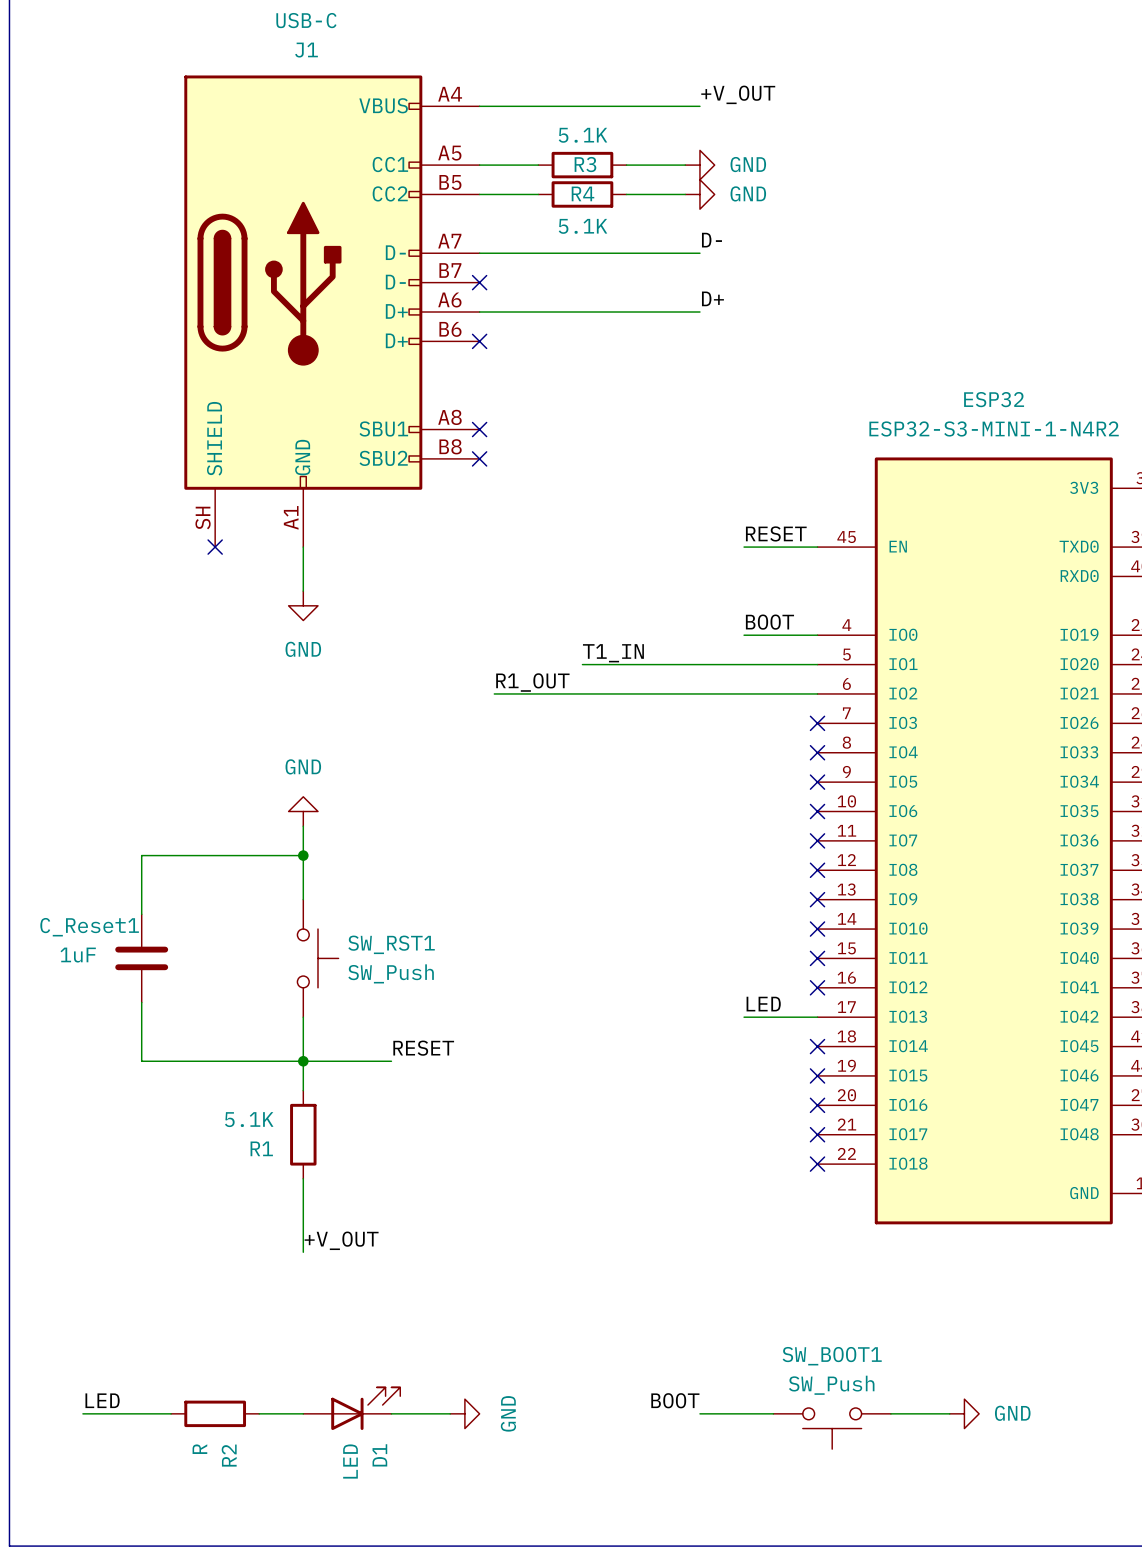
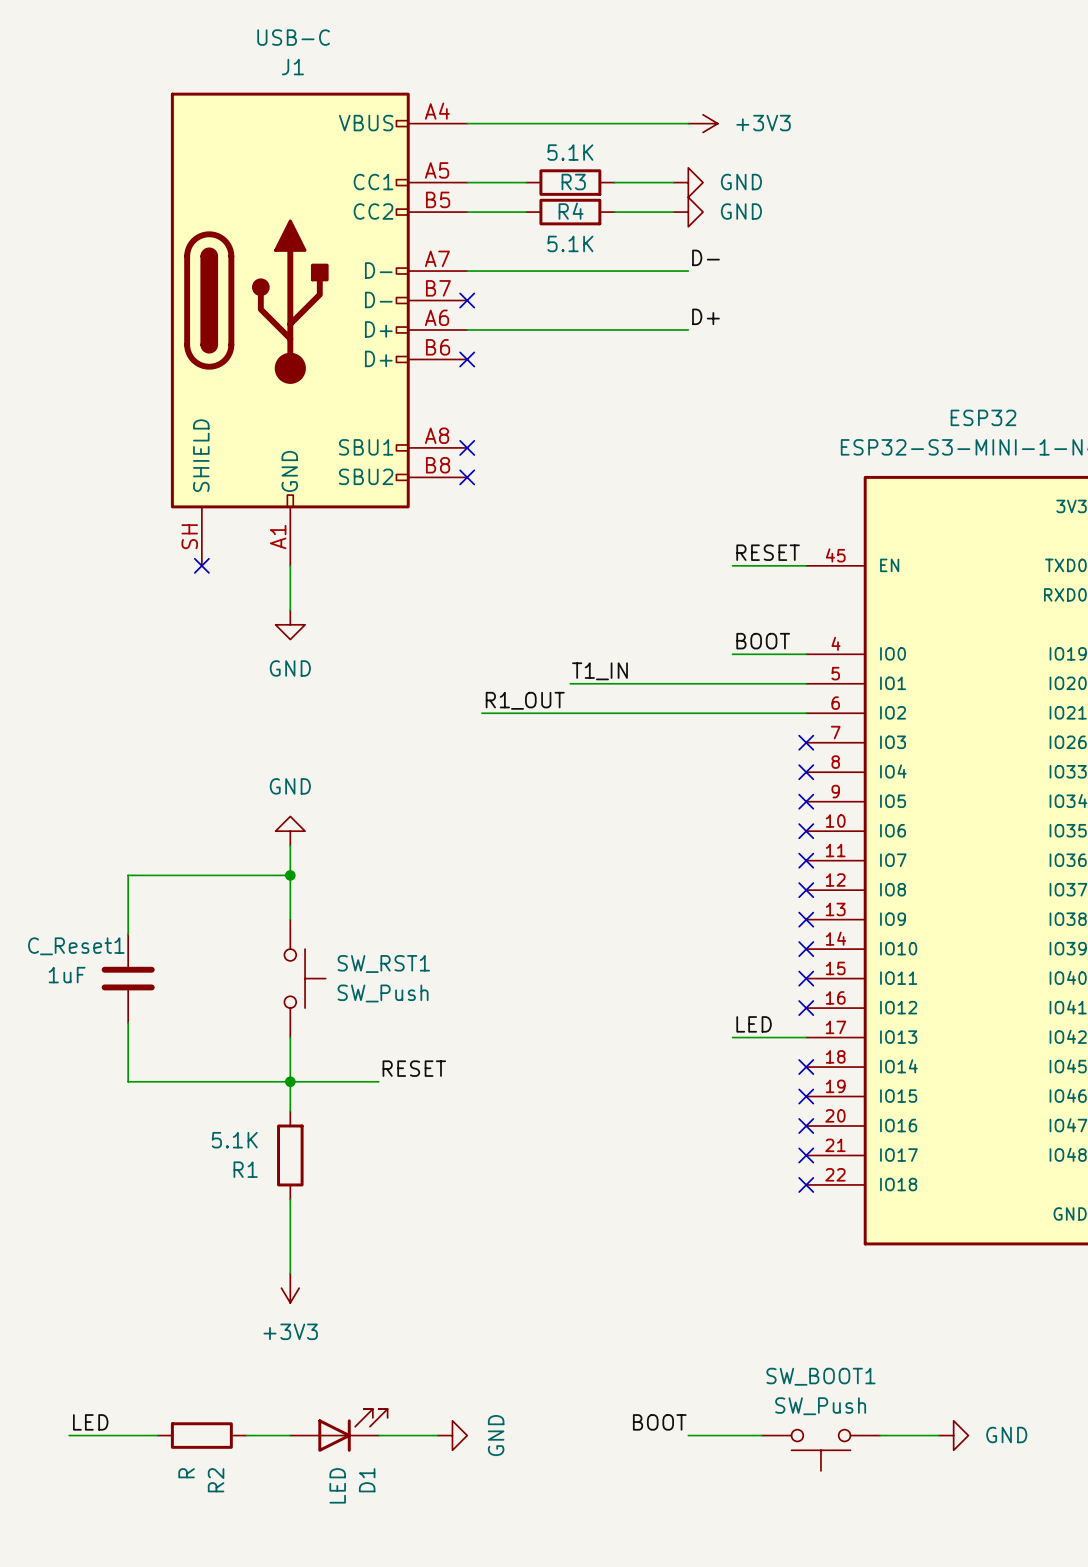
label: +V_OUT (738, 94) -> none
power symbol: none -> +3V3 (703, 123)
label: +V_OUT (341, 1240) -> none
power symbol: none -> +3V3 (290, 1288)

